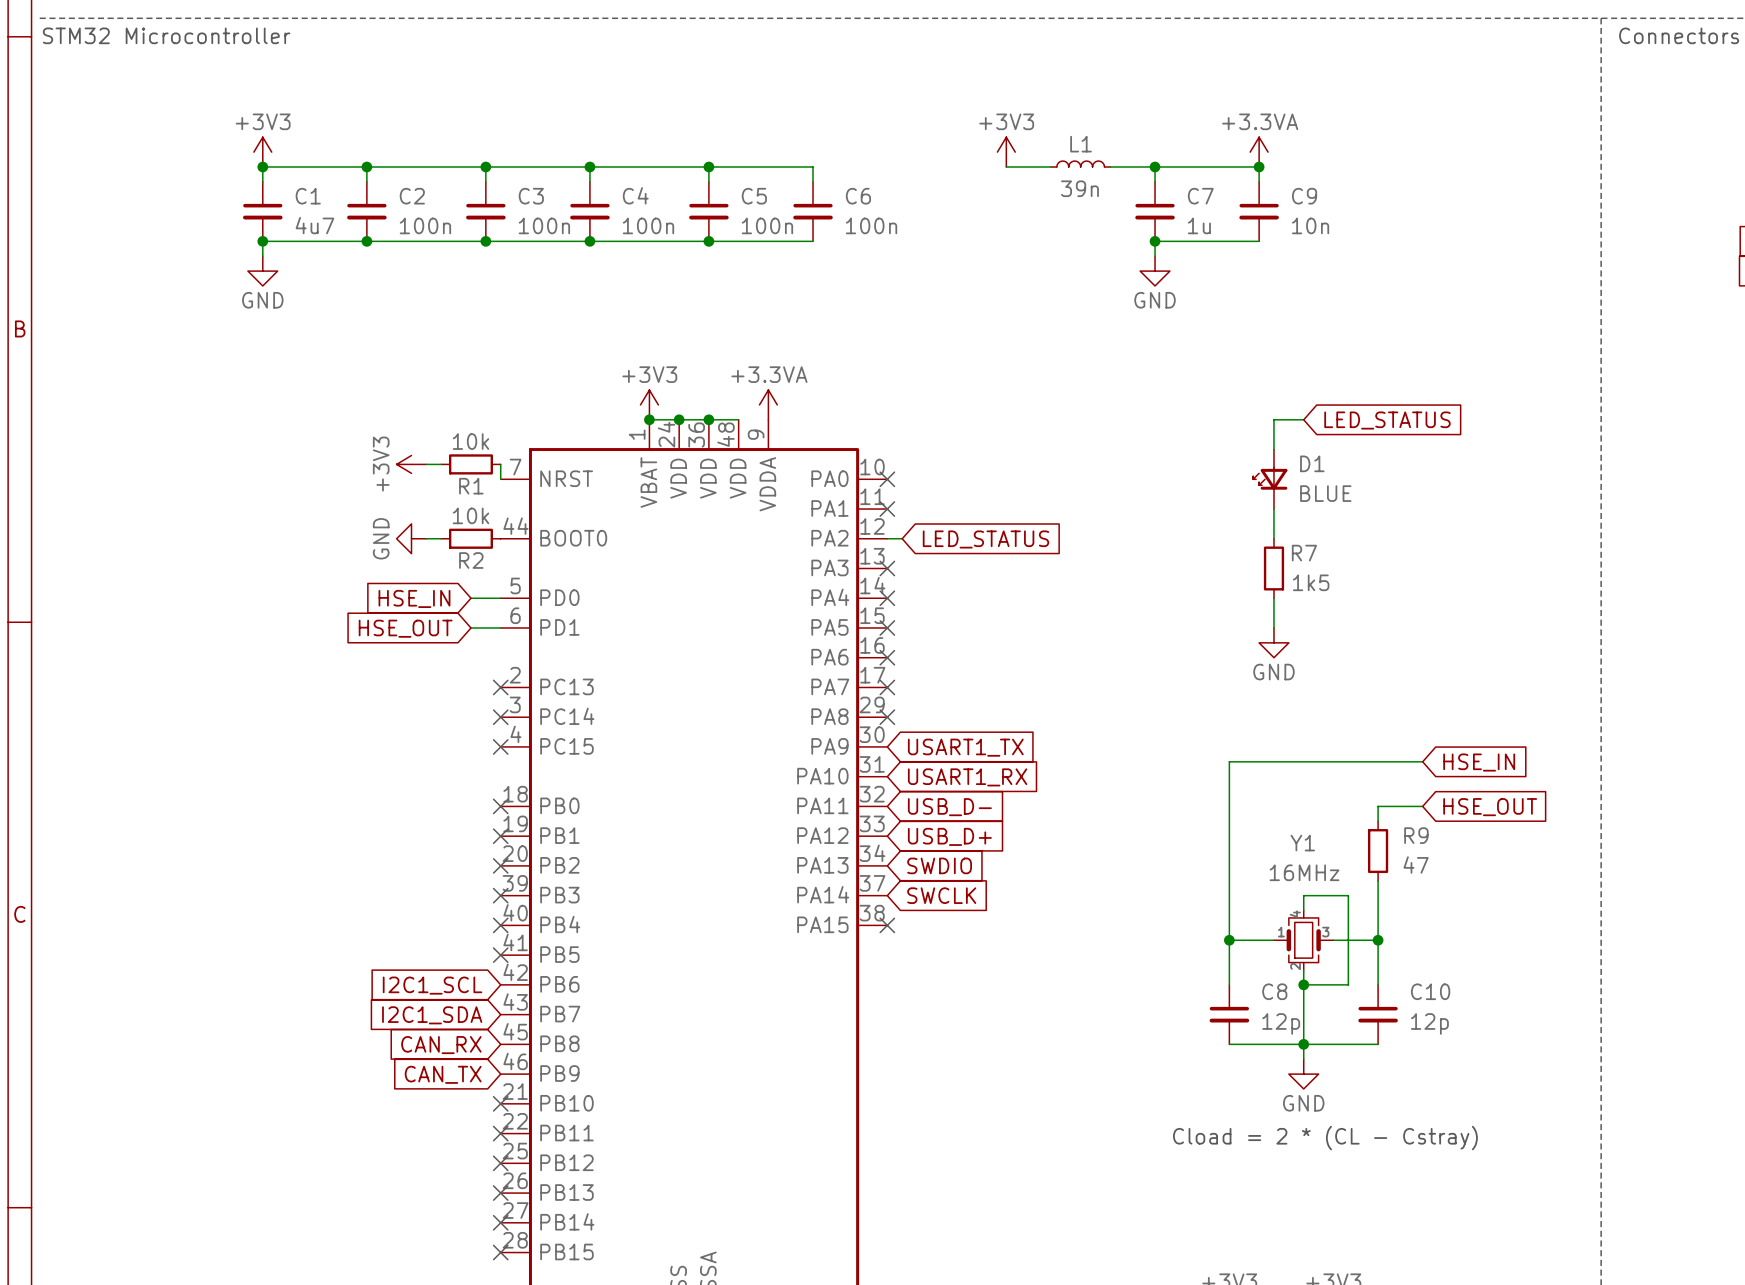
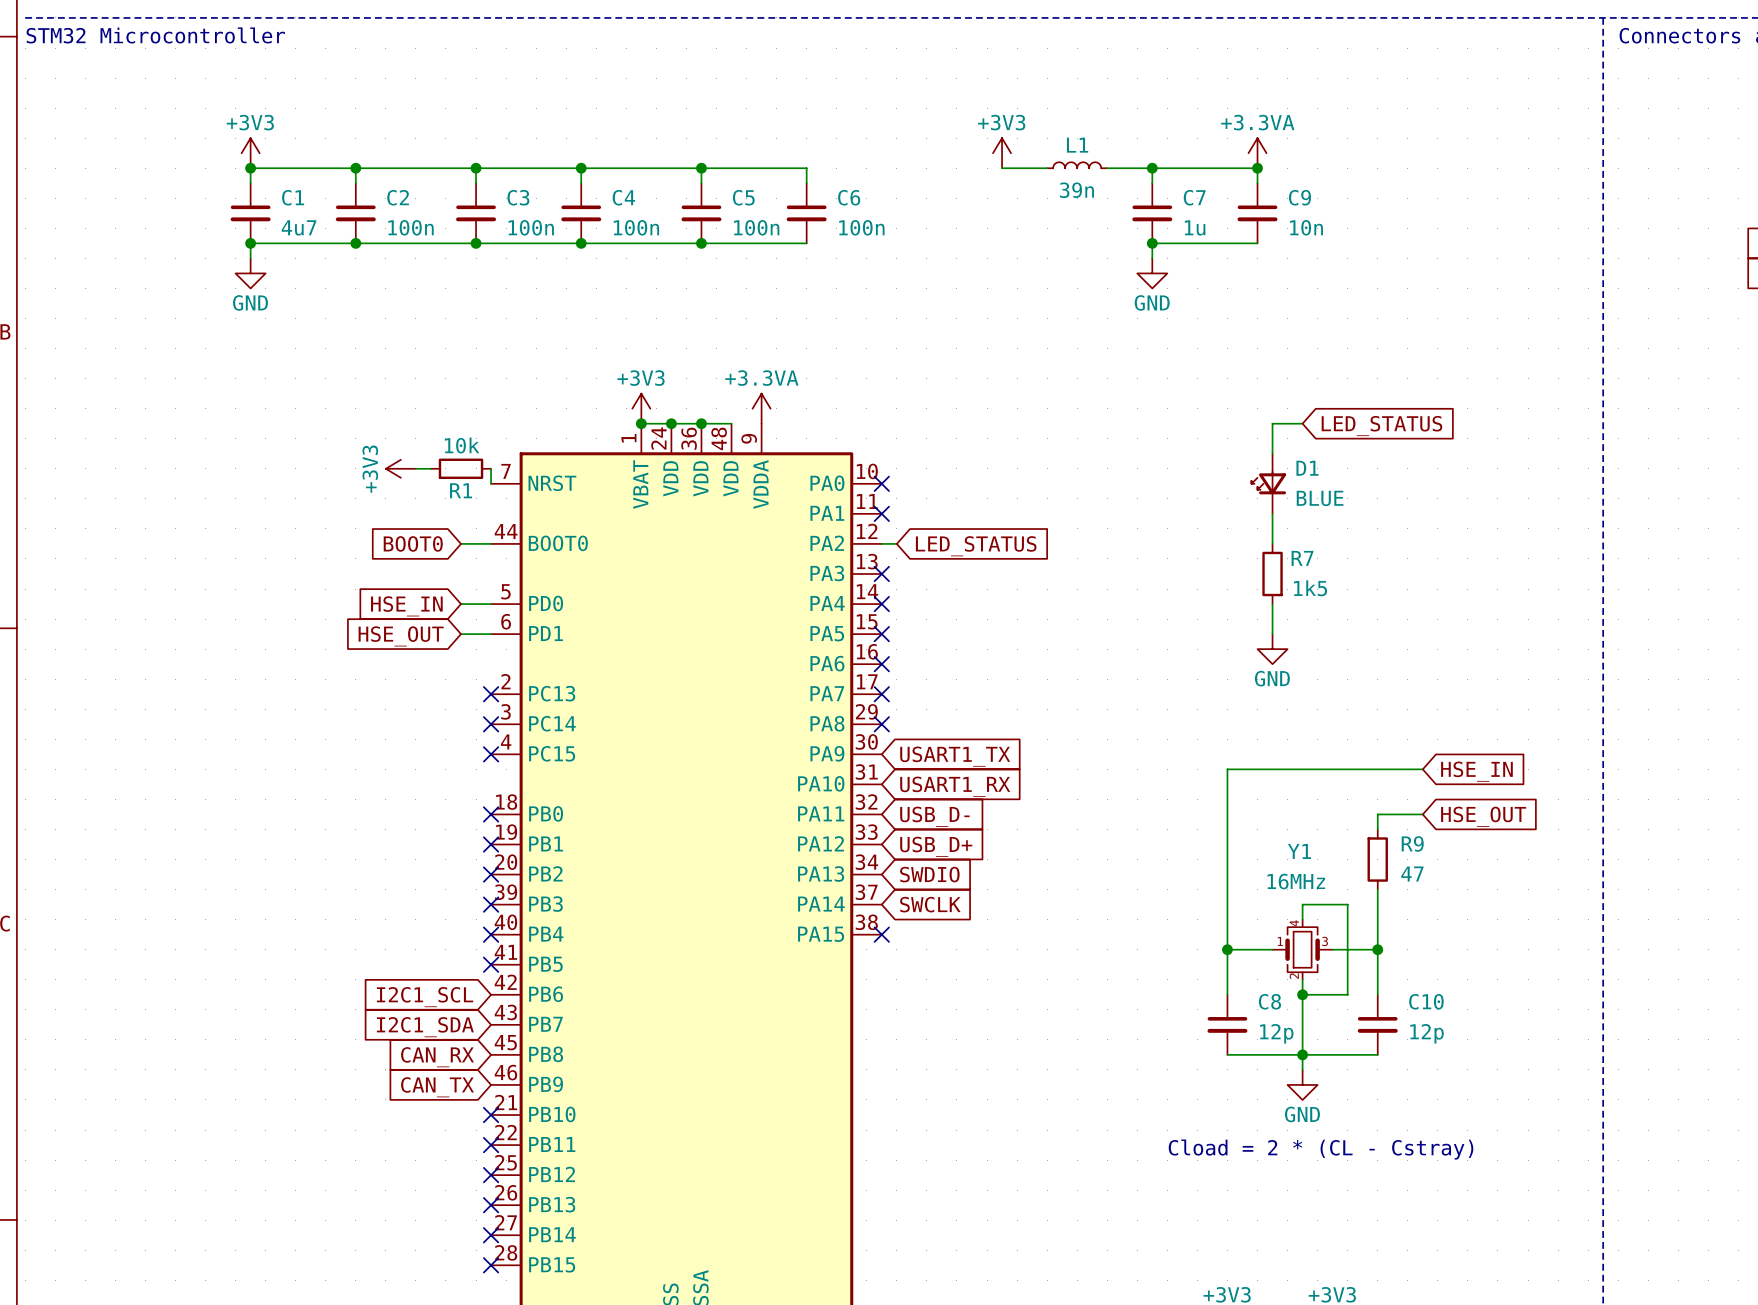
power symbol: GND (411, 538) -> none
global label: none -> BOOT0 (413, 543)
wire: (426, 538) (441, 538) -> none
wire: none -> (461, 543) (491, 543)
R2: 10k (470, 538) -> none

